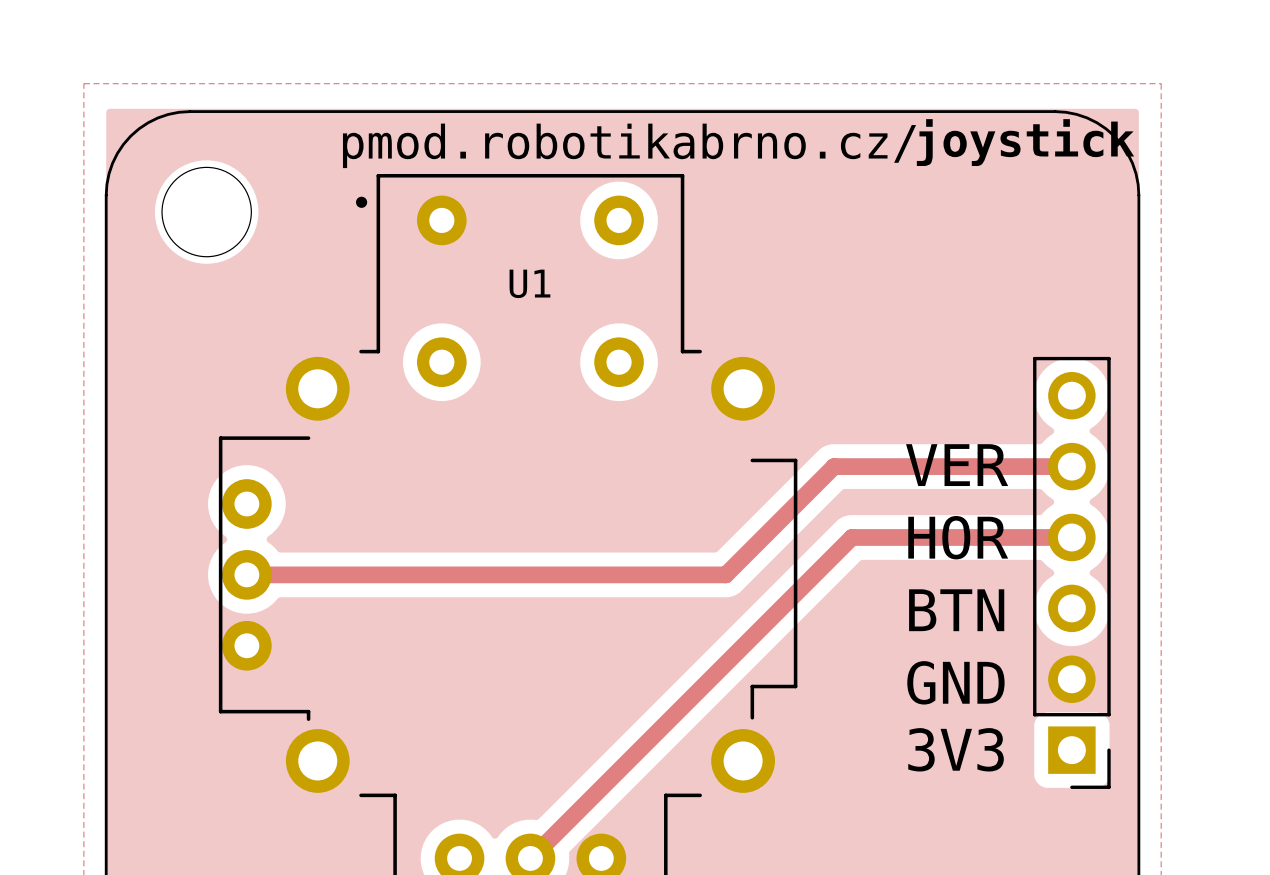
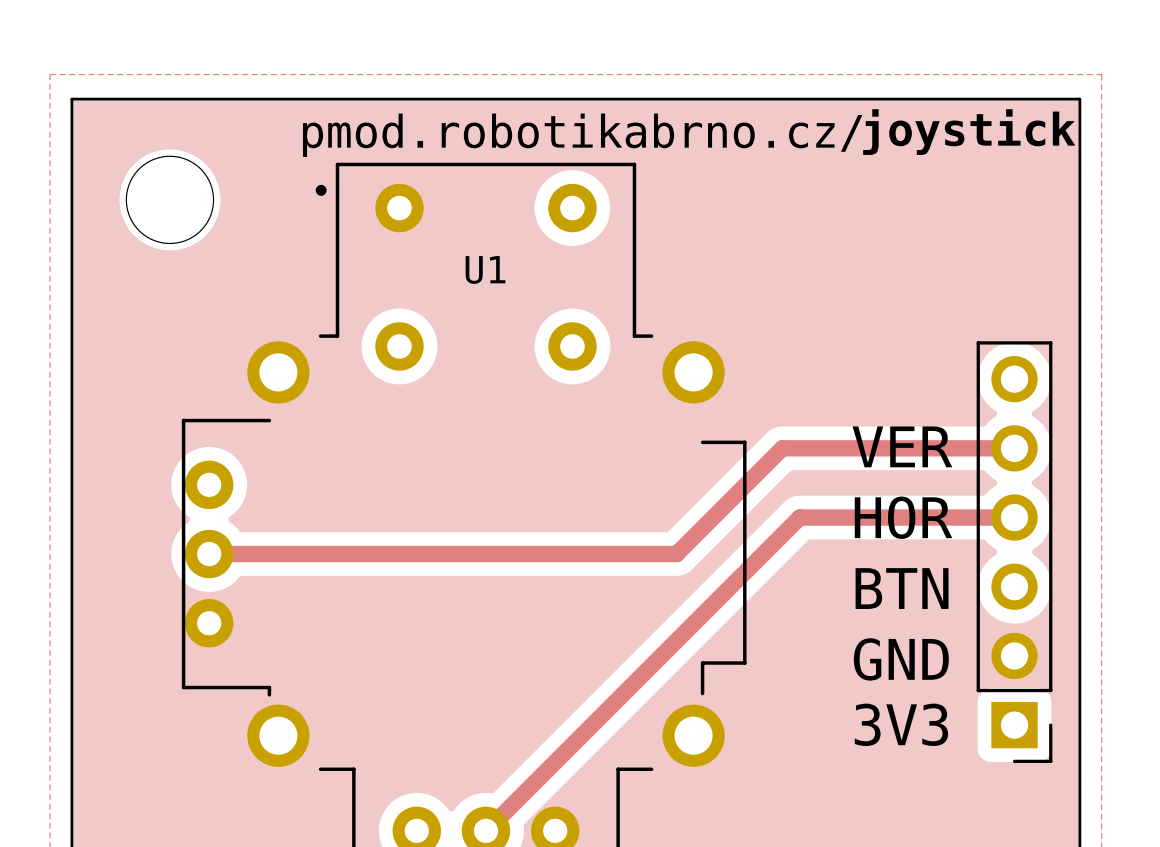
board edge: (106, 195) (112, 163) (130, 136) (157, 117) (189, 111) (1066, 112) (1097, 122) (1114, 136) (1132, 163) (1138, 195) -> (71, 183) (71, 99) (1079, 99) (1079, 183)

